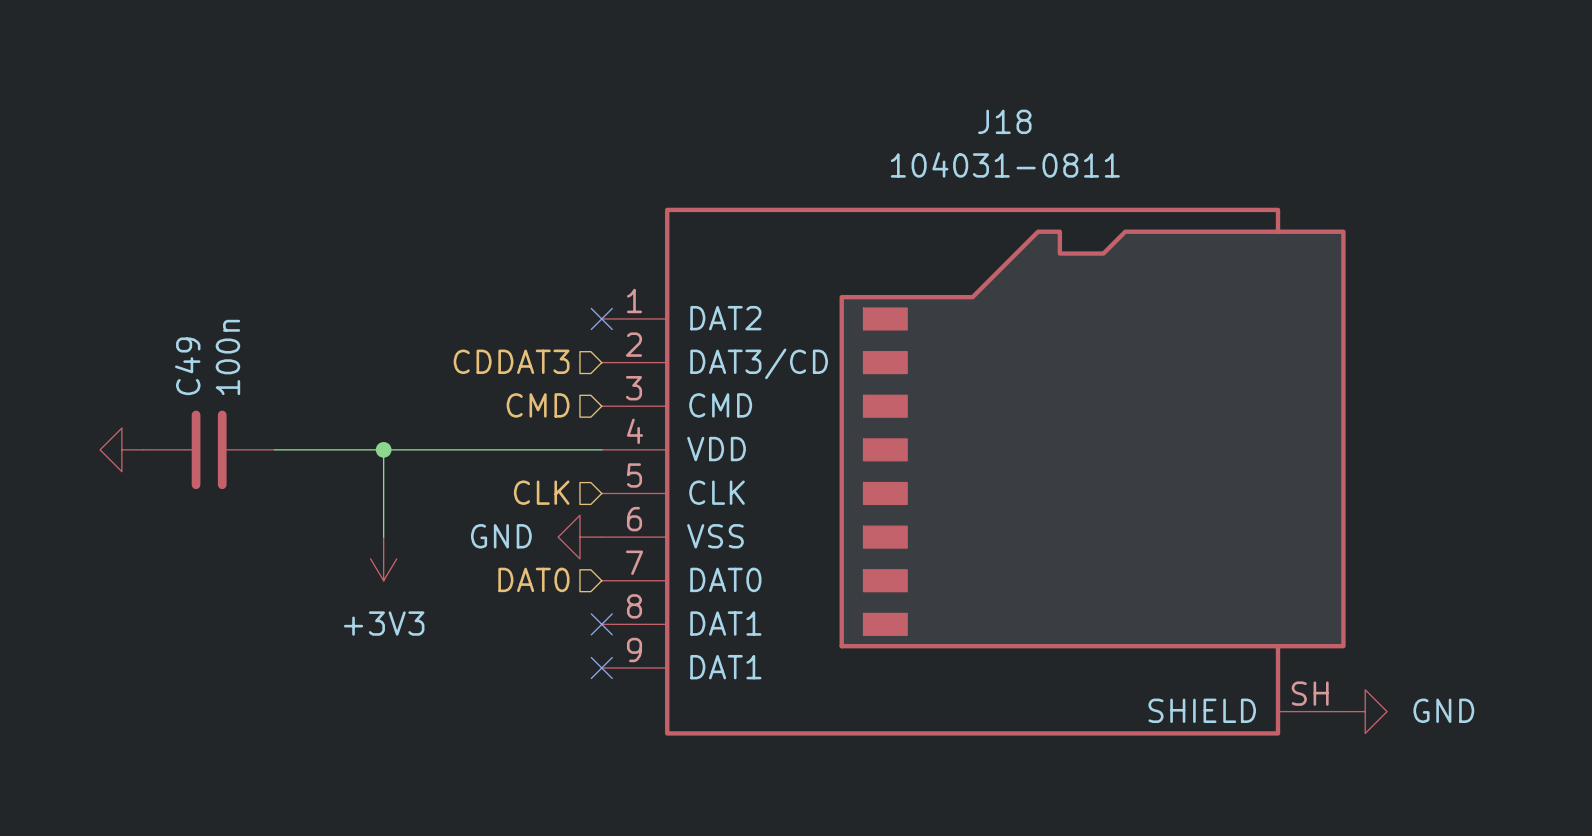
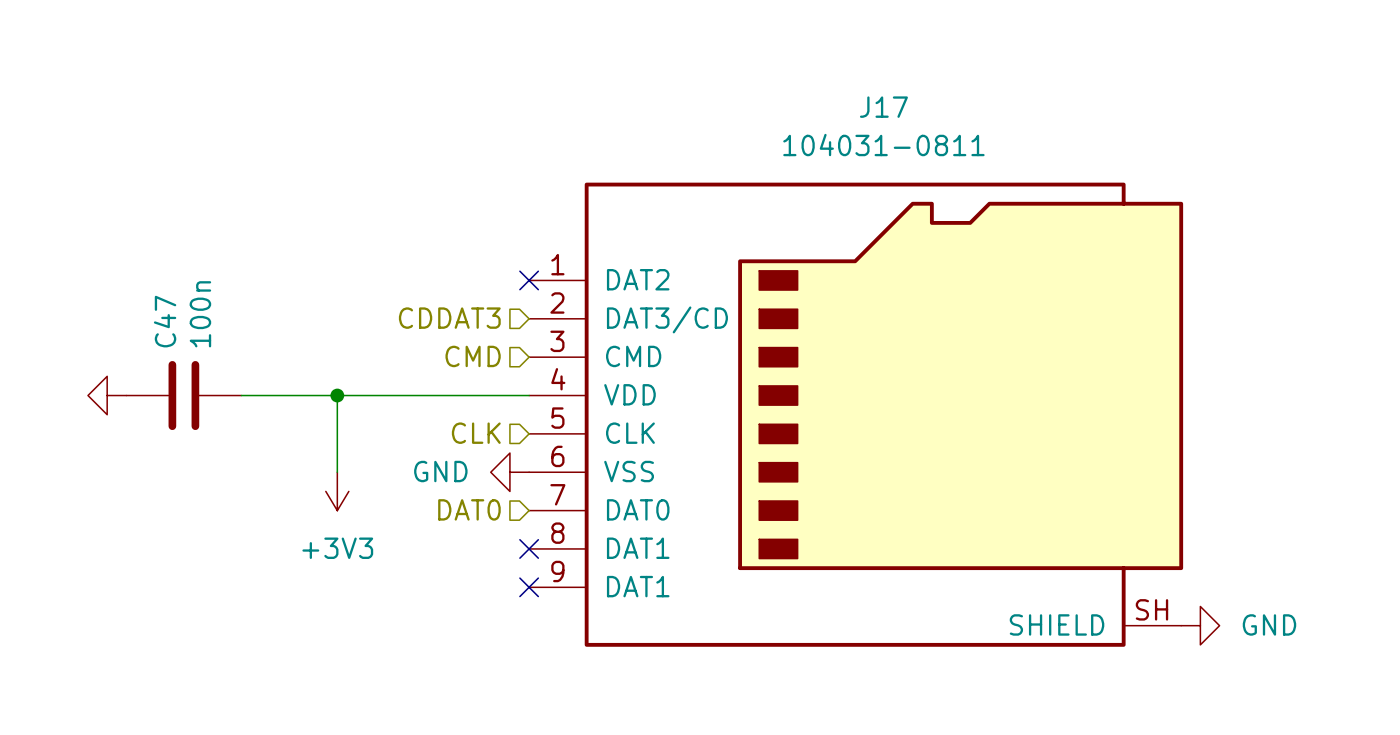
J18 name: J18 (1004, 121) -> J17 (883, 107)
C49 name: C49 (187, 366) -> C47 (165, 321)

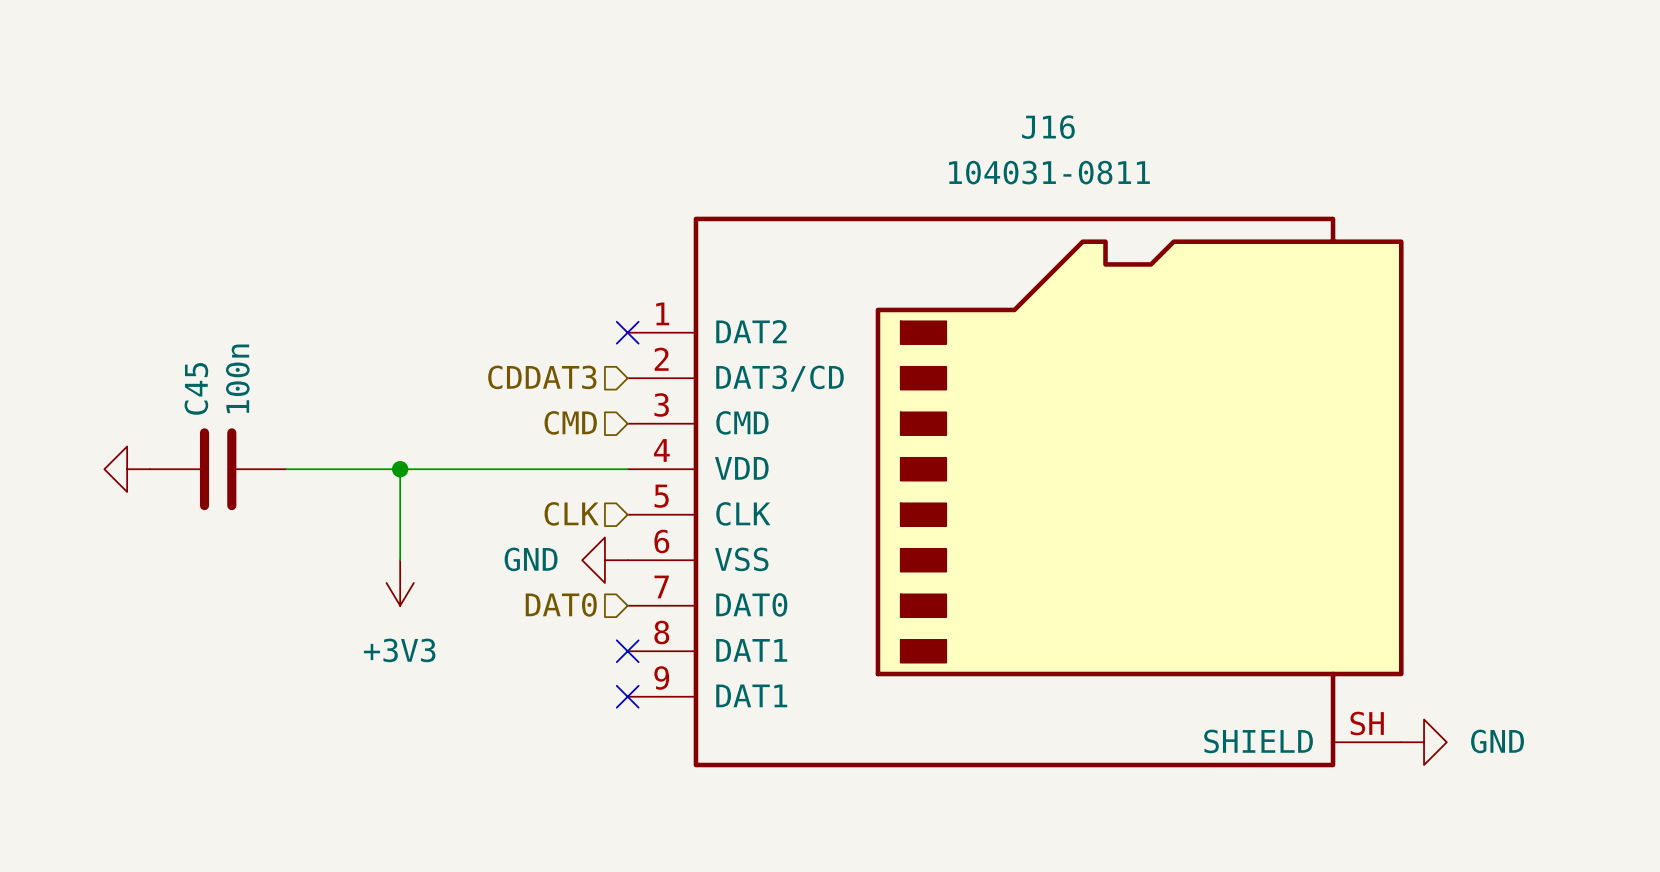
J17 name: J17 (883, 107) -> J16 (1048, 127)
C47 name: C47 (165, 321) -> C45 (196, 388)

